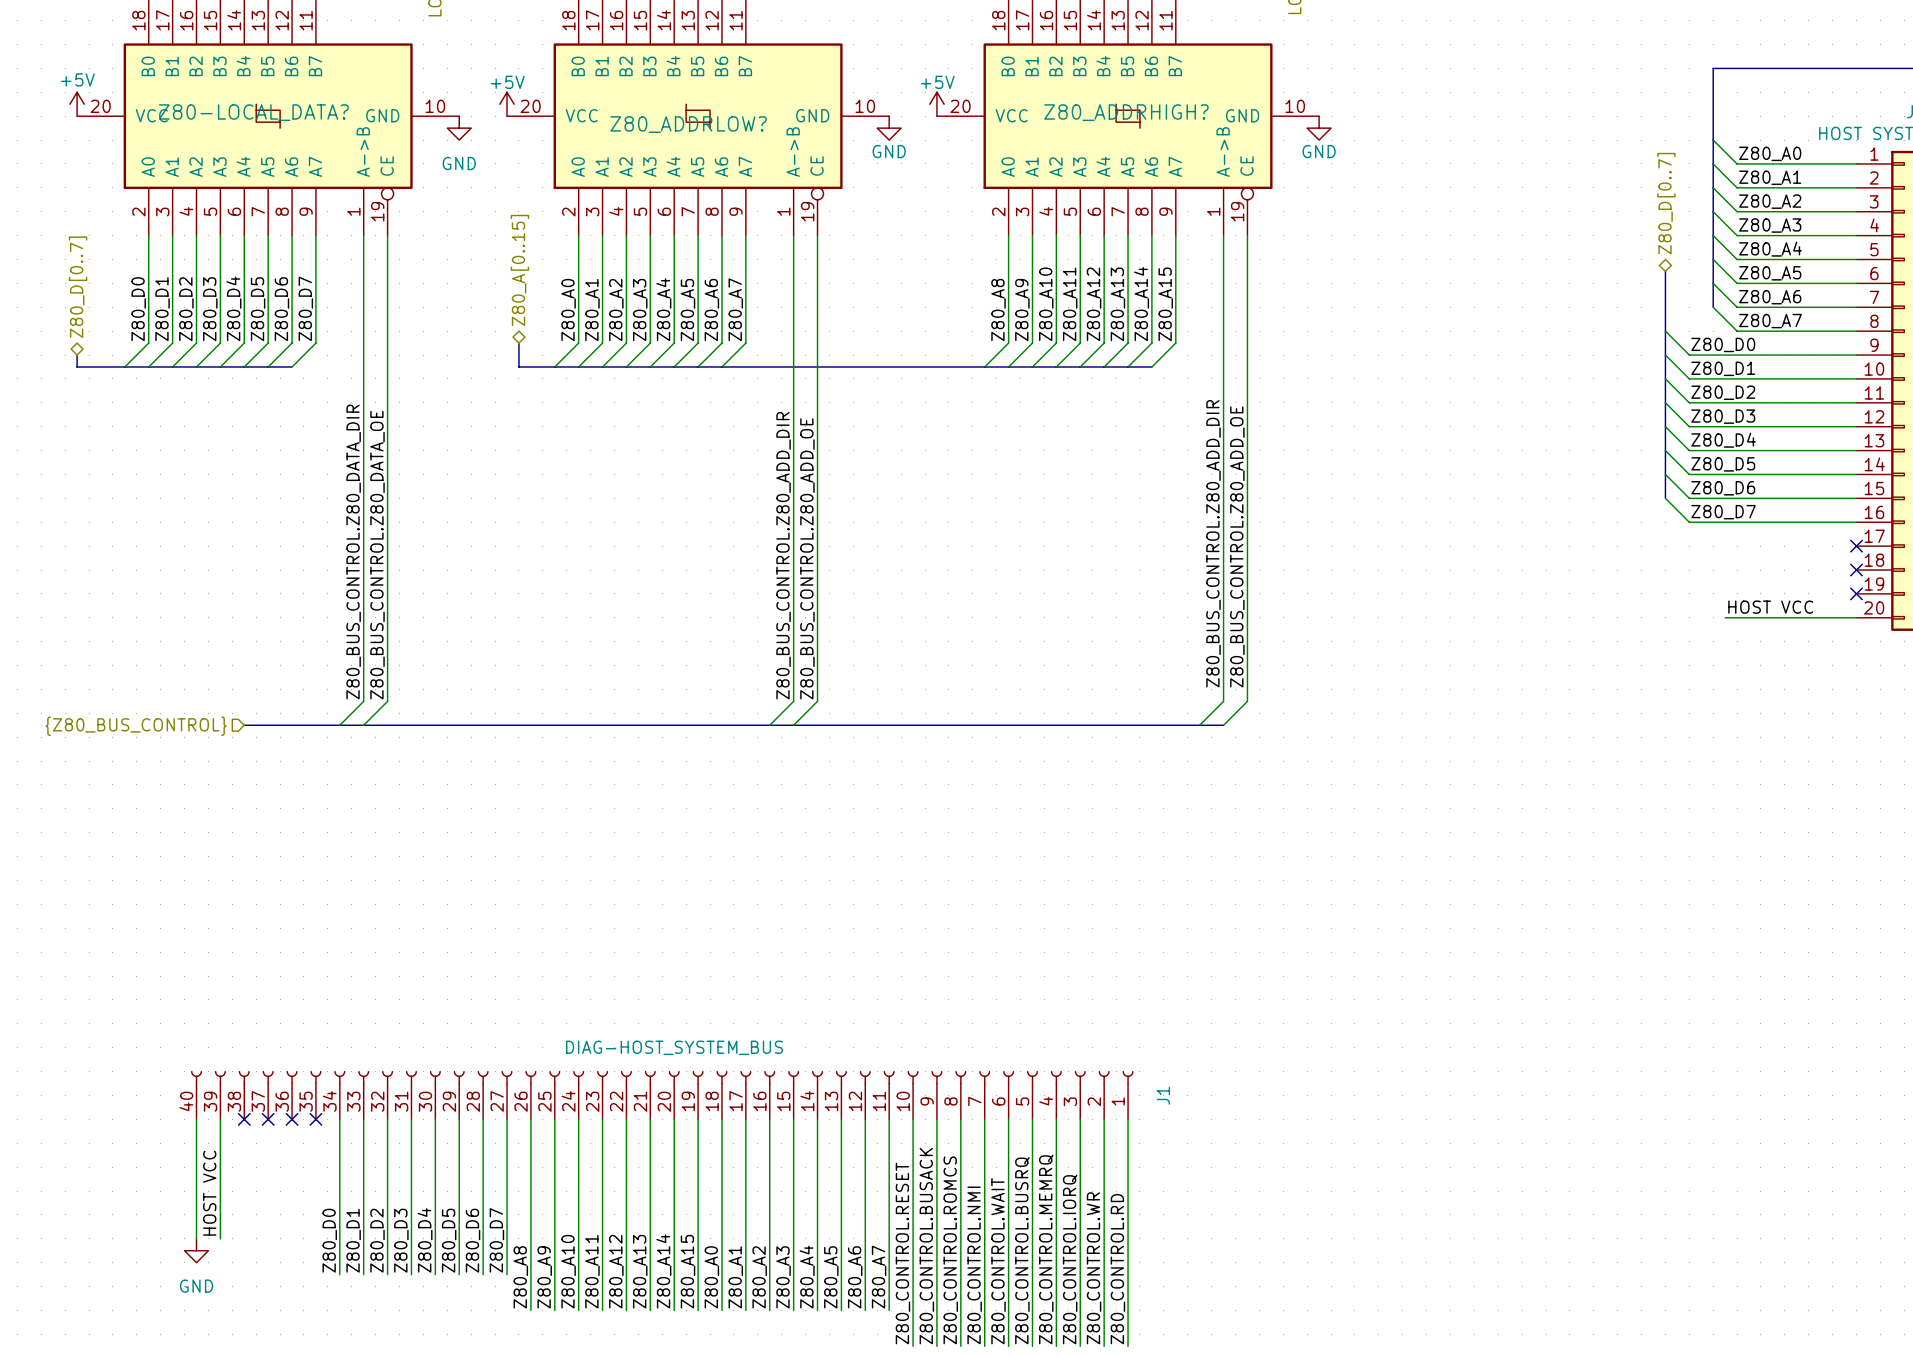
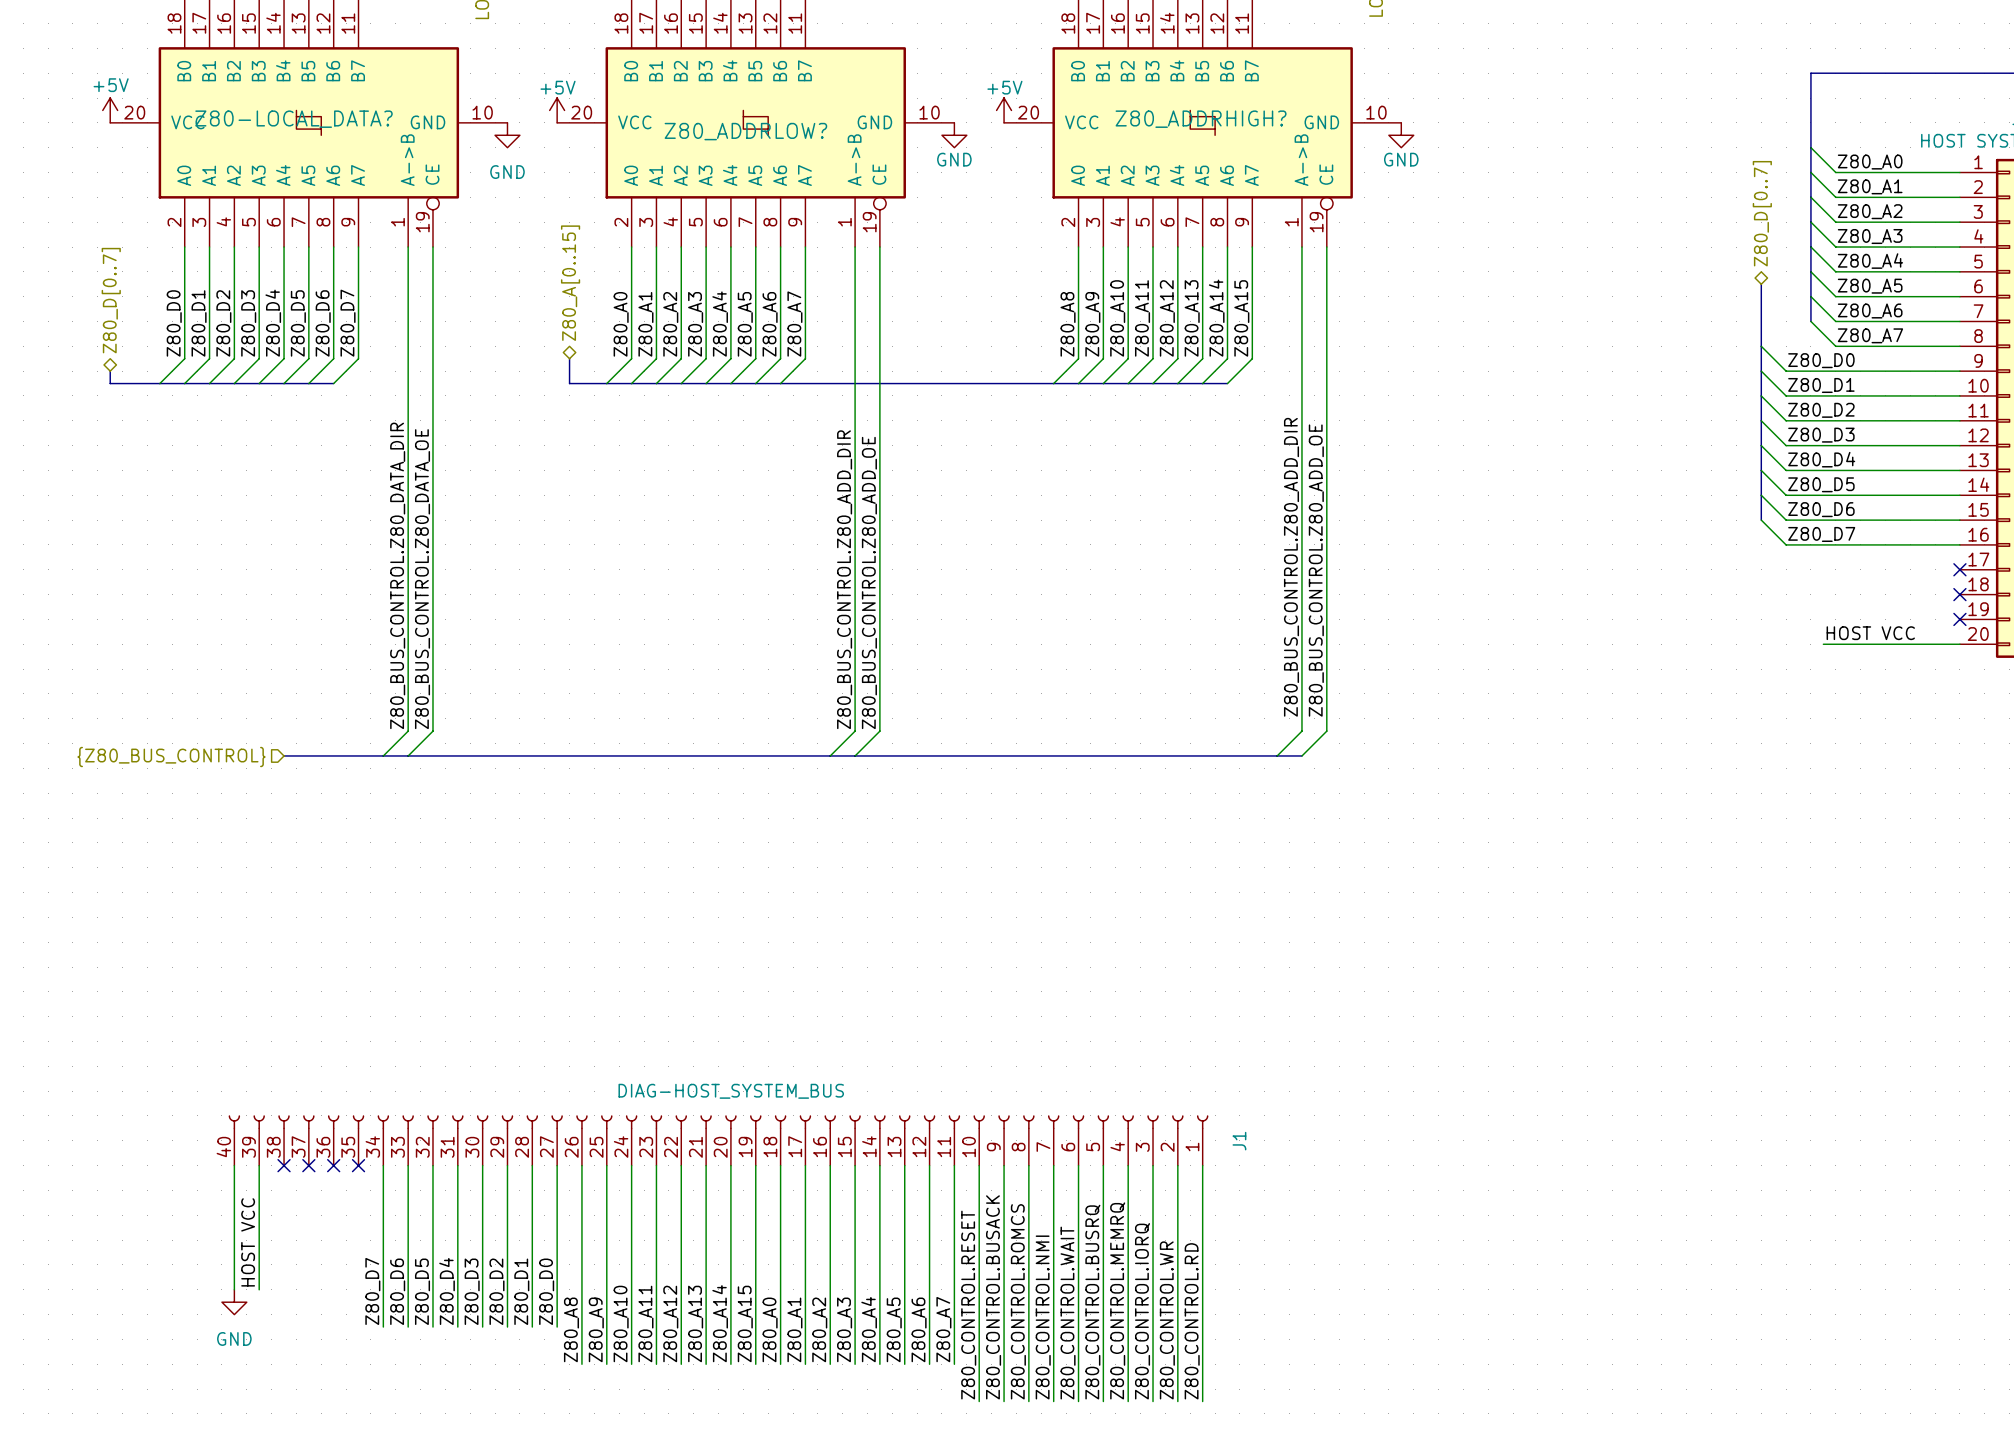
label: Z80_D0 (329, 1240) -> Z80_D7 (372, 1291)
label: Z80_D1 (353, 1240) -> Z80_D6 (397, 1291)
label: Z80_D2 (377, 1240) -> Z80_D5 (422, 1291)
label: Z80_D3 (401, 1240) -> Z80_D4 (447, 1291)
label: Z80_D4 (424, 1240) -> Z80_D3 (472, 1291)
label: Z80_D5 (449, 1240) -> Z80_D2 (496, 1291)
label: Z80_D6 (473, 1240) -> Z80_D1 (521, 1291)
label: Z80_D7 (496, 1240) -> Z80_D0 (546, 1291)

